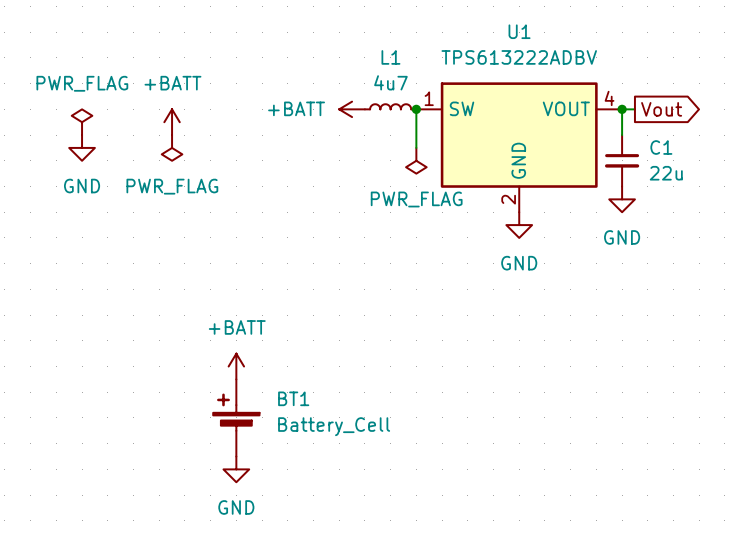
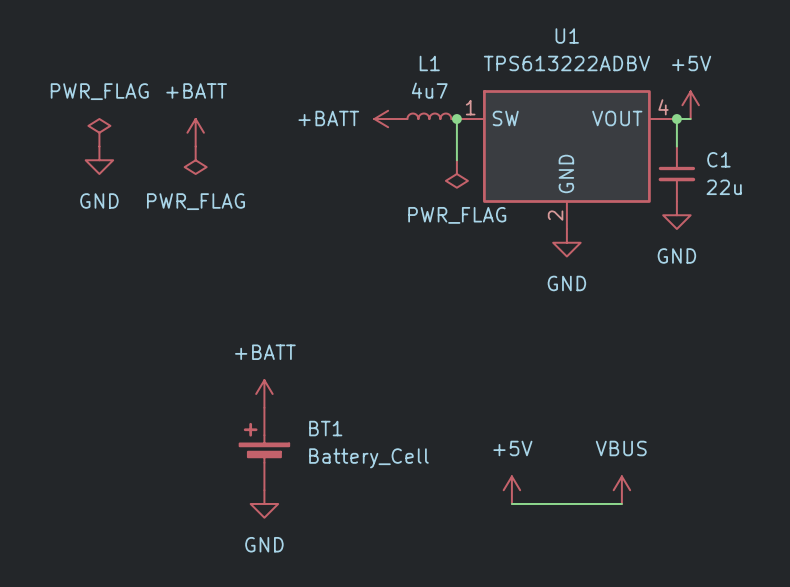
power symbol: none -> +5V (690, 105)
global label: Vout (661, 109) -> none
power symbol: none -> +5V (511, 490)
power symbol: none -> VBUS (621, 490)
wire: none -> (511, 503) (621, 503)

